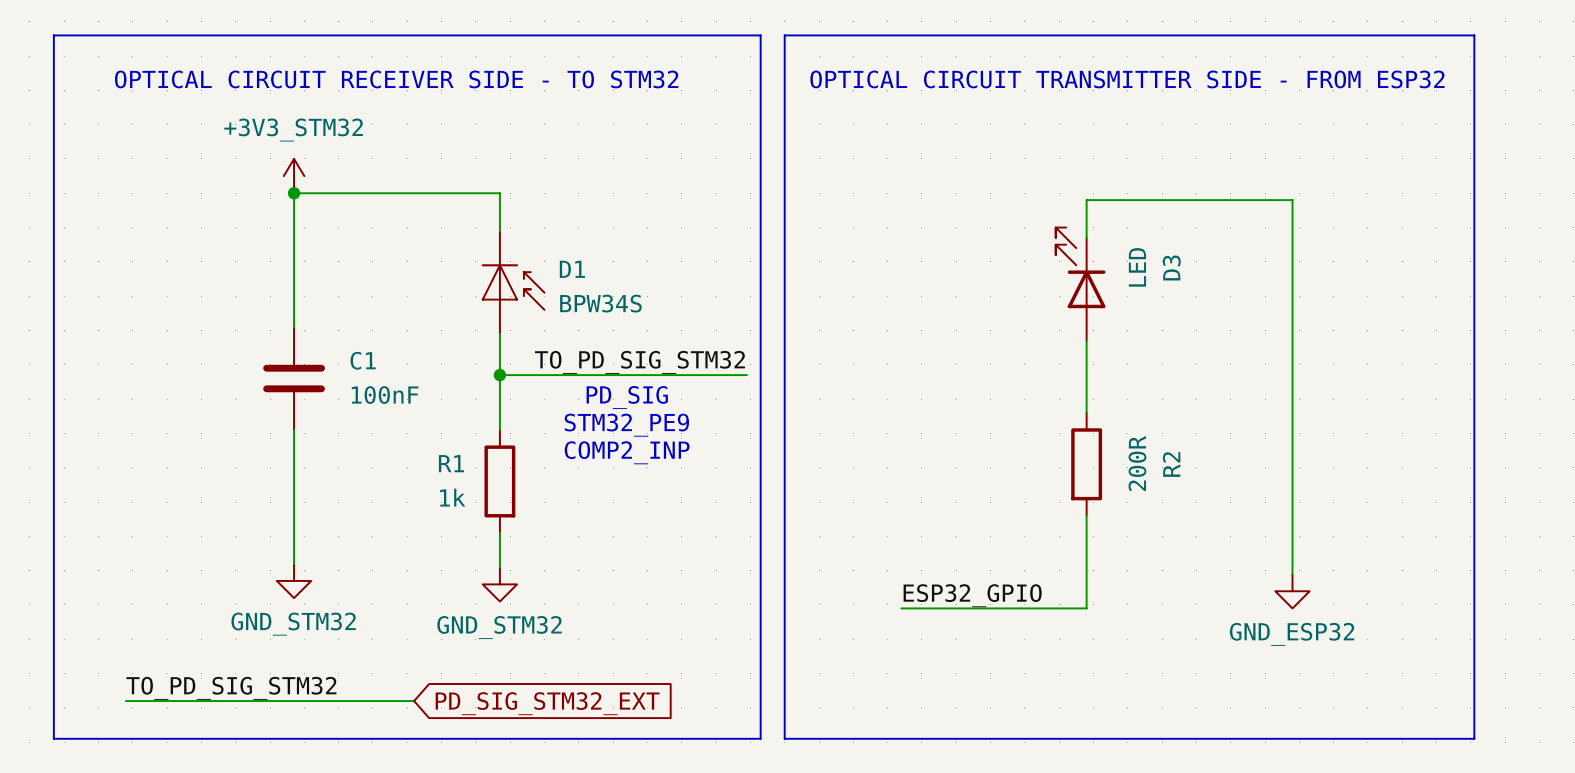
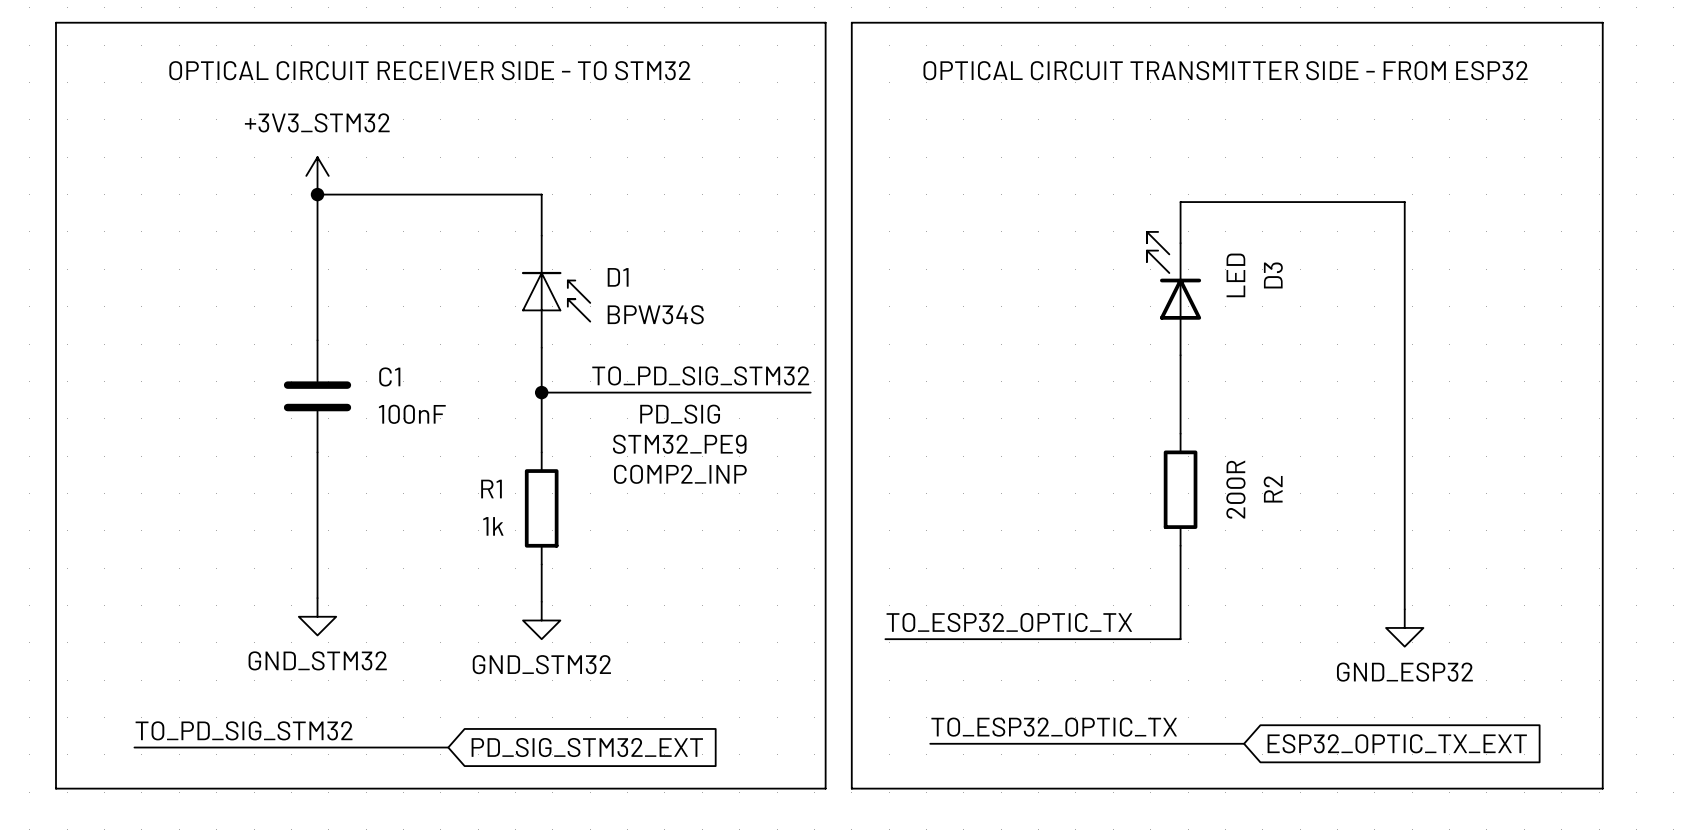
label: none -> TO_ESP32_OPTIC_TX (1009, 622)
label: ESP32_GPIO (972, 595) -> none
wire: (1086, 601) (1086, 608) (901, 608) -> (1180, 639) (885, 639)
label: none -> TO_ESP32_OPTIC_TX (1054, 727)
wire: none -> (930, 743) (1244, 743)
global label: none -> ESP32_OPTIC_TX_EXT (1397, 743)

